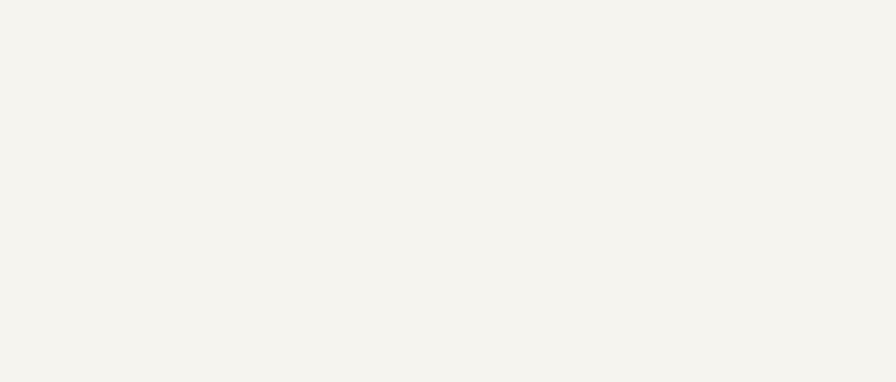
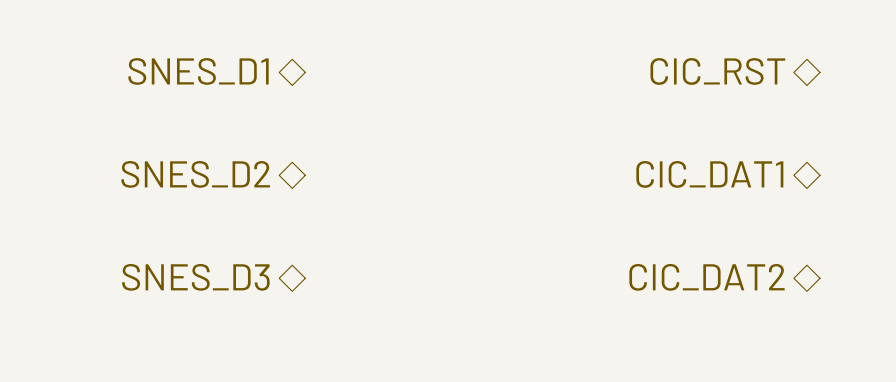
hierarchical label: none -> SNES_D1 (198, 71)
hierarchical label: none -> CIC_RST (717, 71)
hierarchical label: none -> SNES_D2 (195, 174)
hierarchical label: none -> CIC_DAT1 (709, 174)
hierarchical label: none -> SNES_D3 (195, 277)
hierarchical label: none -> CIC_DAT2 (707, 277)

